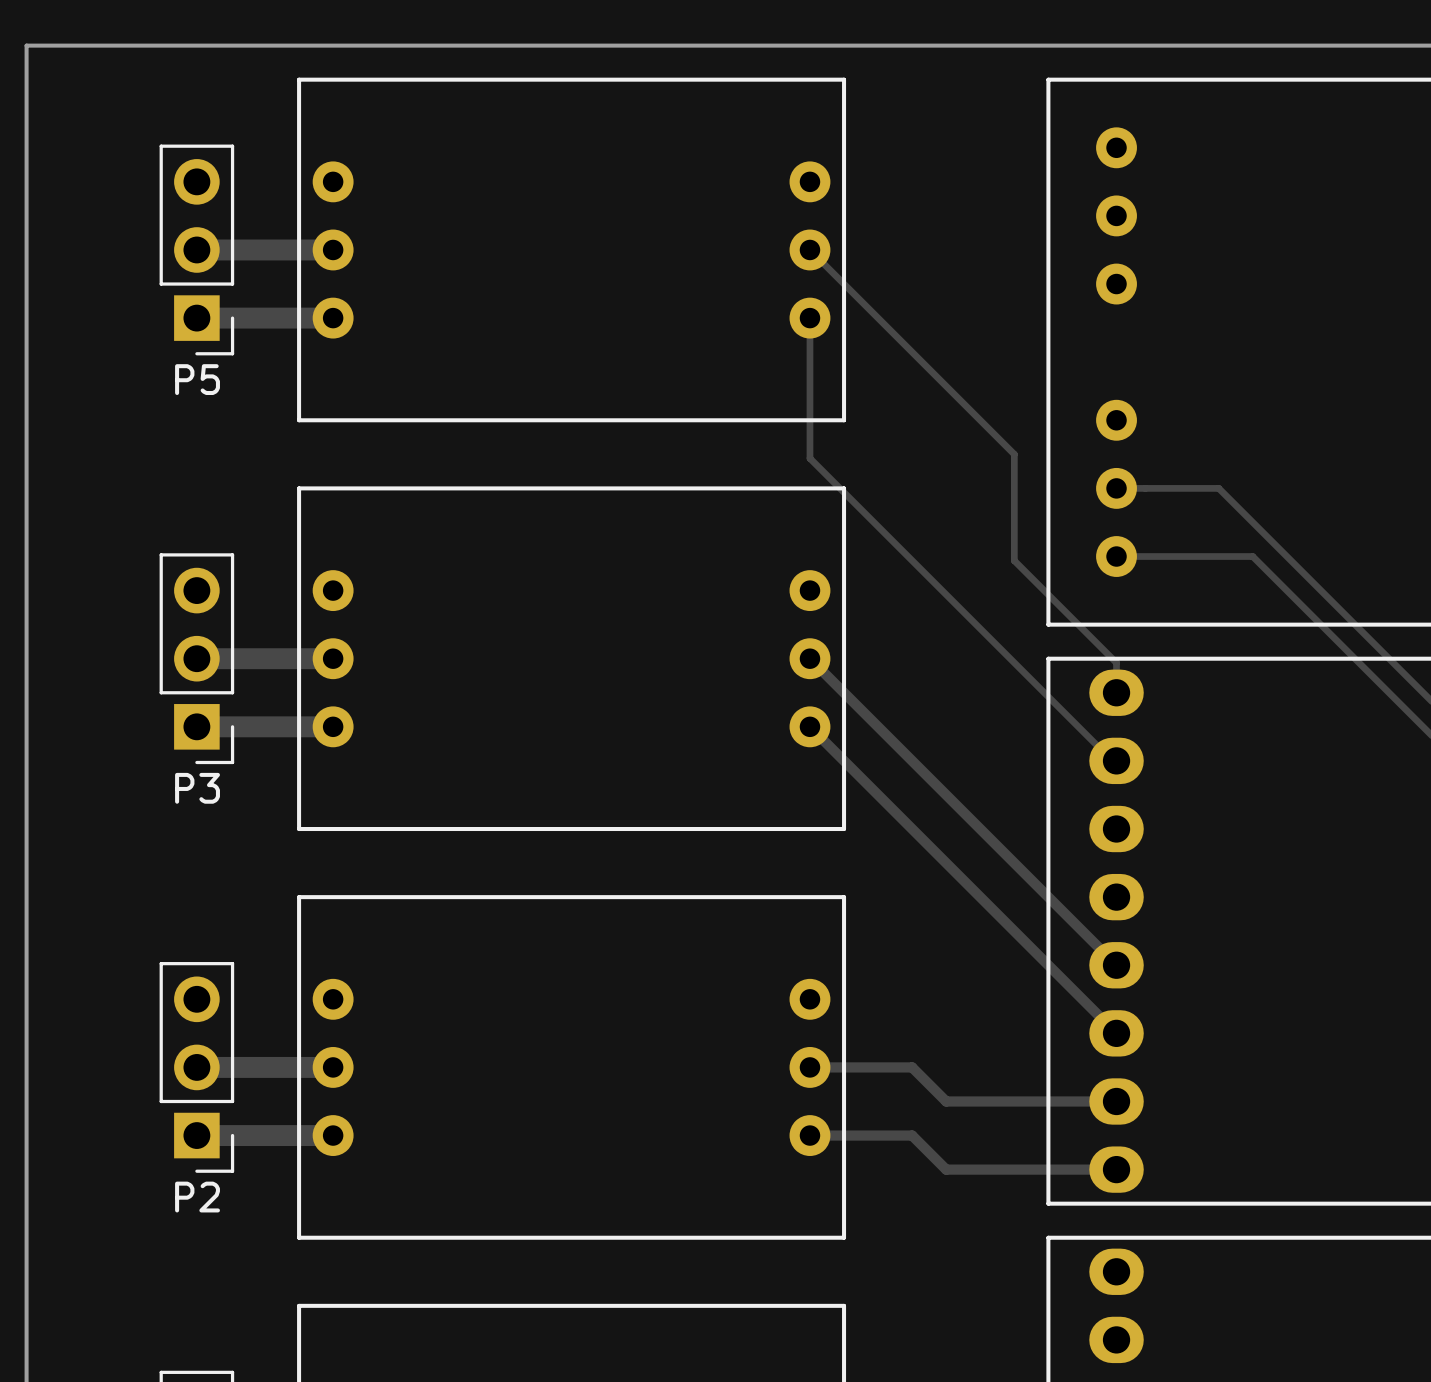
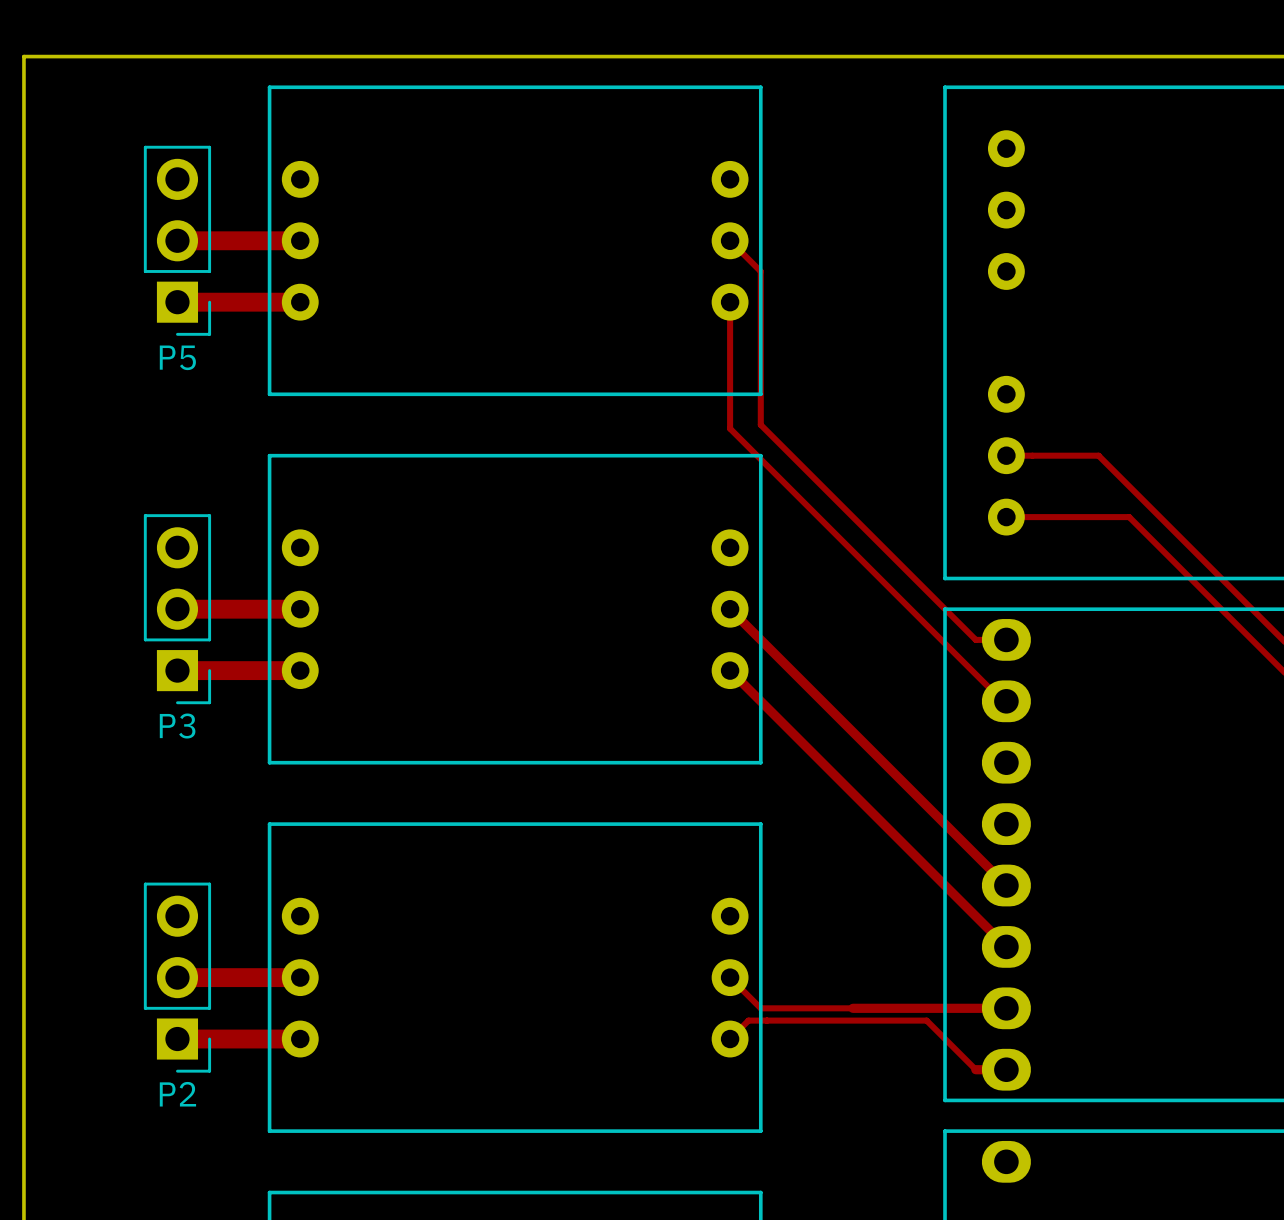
track: (844, 284) (1014, 454) (1014, 560) (1116, 662) (1116, 692) -> (760, 271) (760, 424) (975, 639) (1006, 639)
track: (809, 1067) (912, 1067) (946, 1101) -> (730, 977) (760, 1008) (852, 1008)
track: (809, 1135) (912, 1135) (946, 1169) (1082, 1169) -> (730, 1039) (748, 1020) (926, 1020) (975, 1069)

